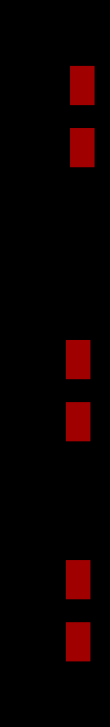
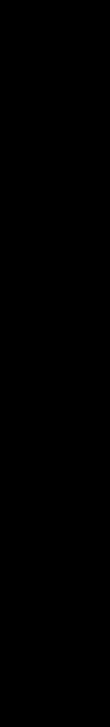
part: (82, 116) -> none
part: (78, 390) -> none
part: (78, 610) -> none

